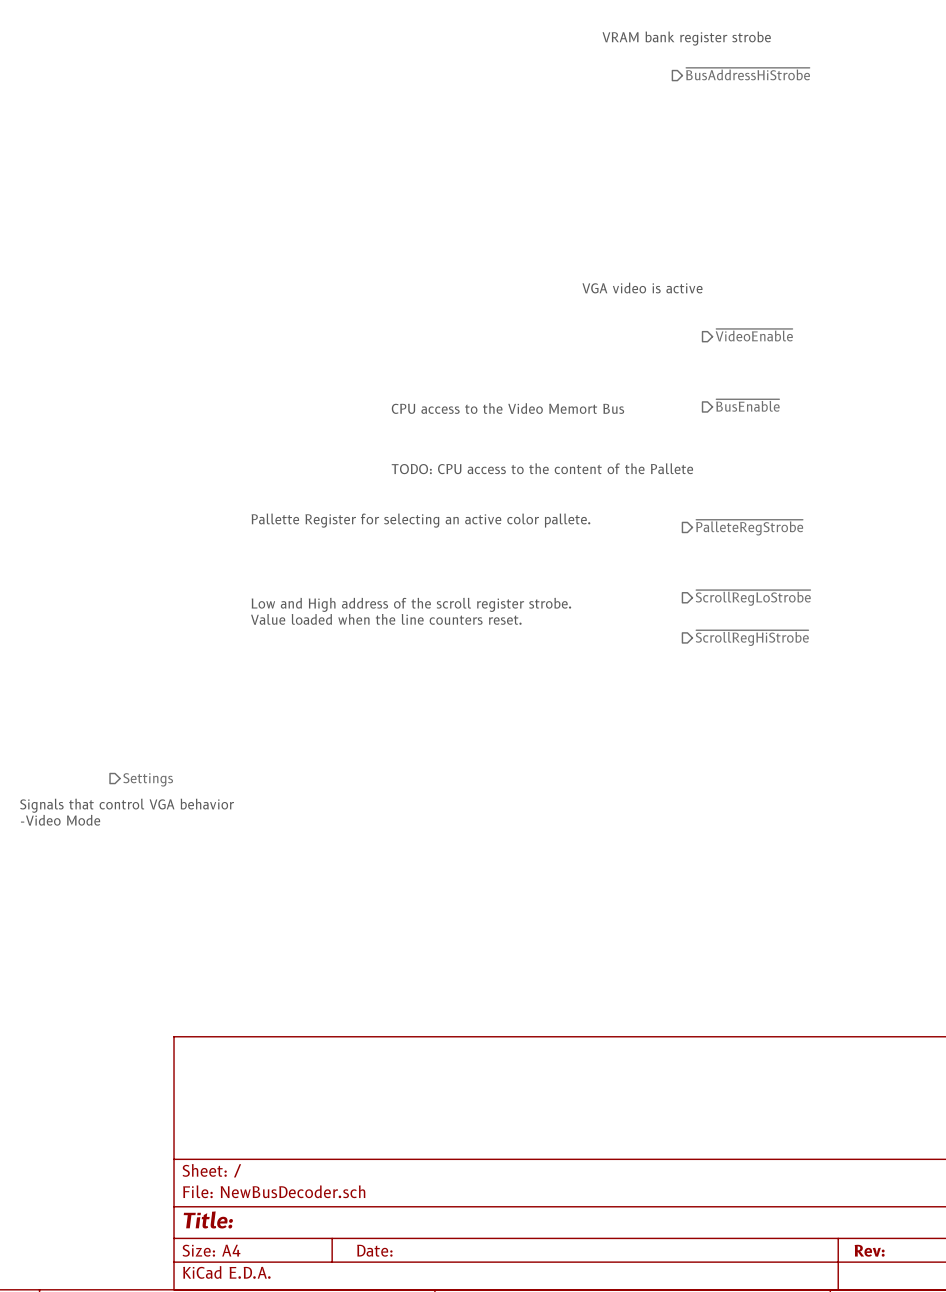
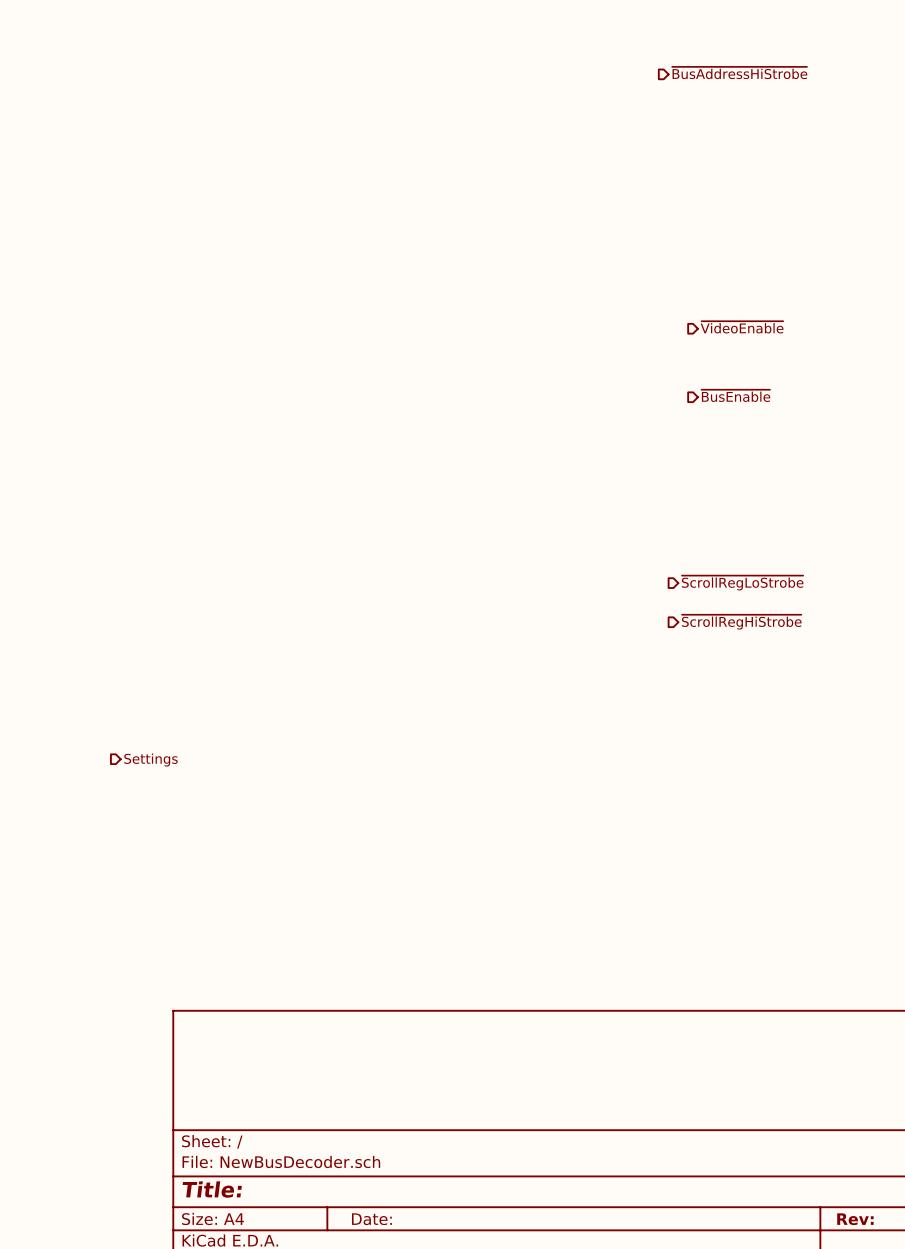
text: VRAM bank register strobe (686, 38) -> none
text: VGA video is active (642, 288) -> none
text: CPU access to the Video Memort Bus (507, 408) -> none
text: TODO: CPU access to the content of the Pallete (542, 468) -> none
text: Pallette Register for selecting an active color pallete. (420, 520) -> none
hierarchical label: ~{PalleteRegStrobe} (749, 527) -> none
text: Low and High address of the scroll register strobe. (411, 604) -> none
text: Value loaded when the line counters reset. (386, 619) -> none
text: Signals that control VGA behavior (127, 805) -> none
text: -Video Mode (60, 820) -> none

